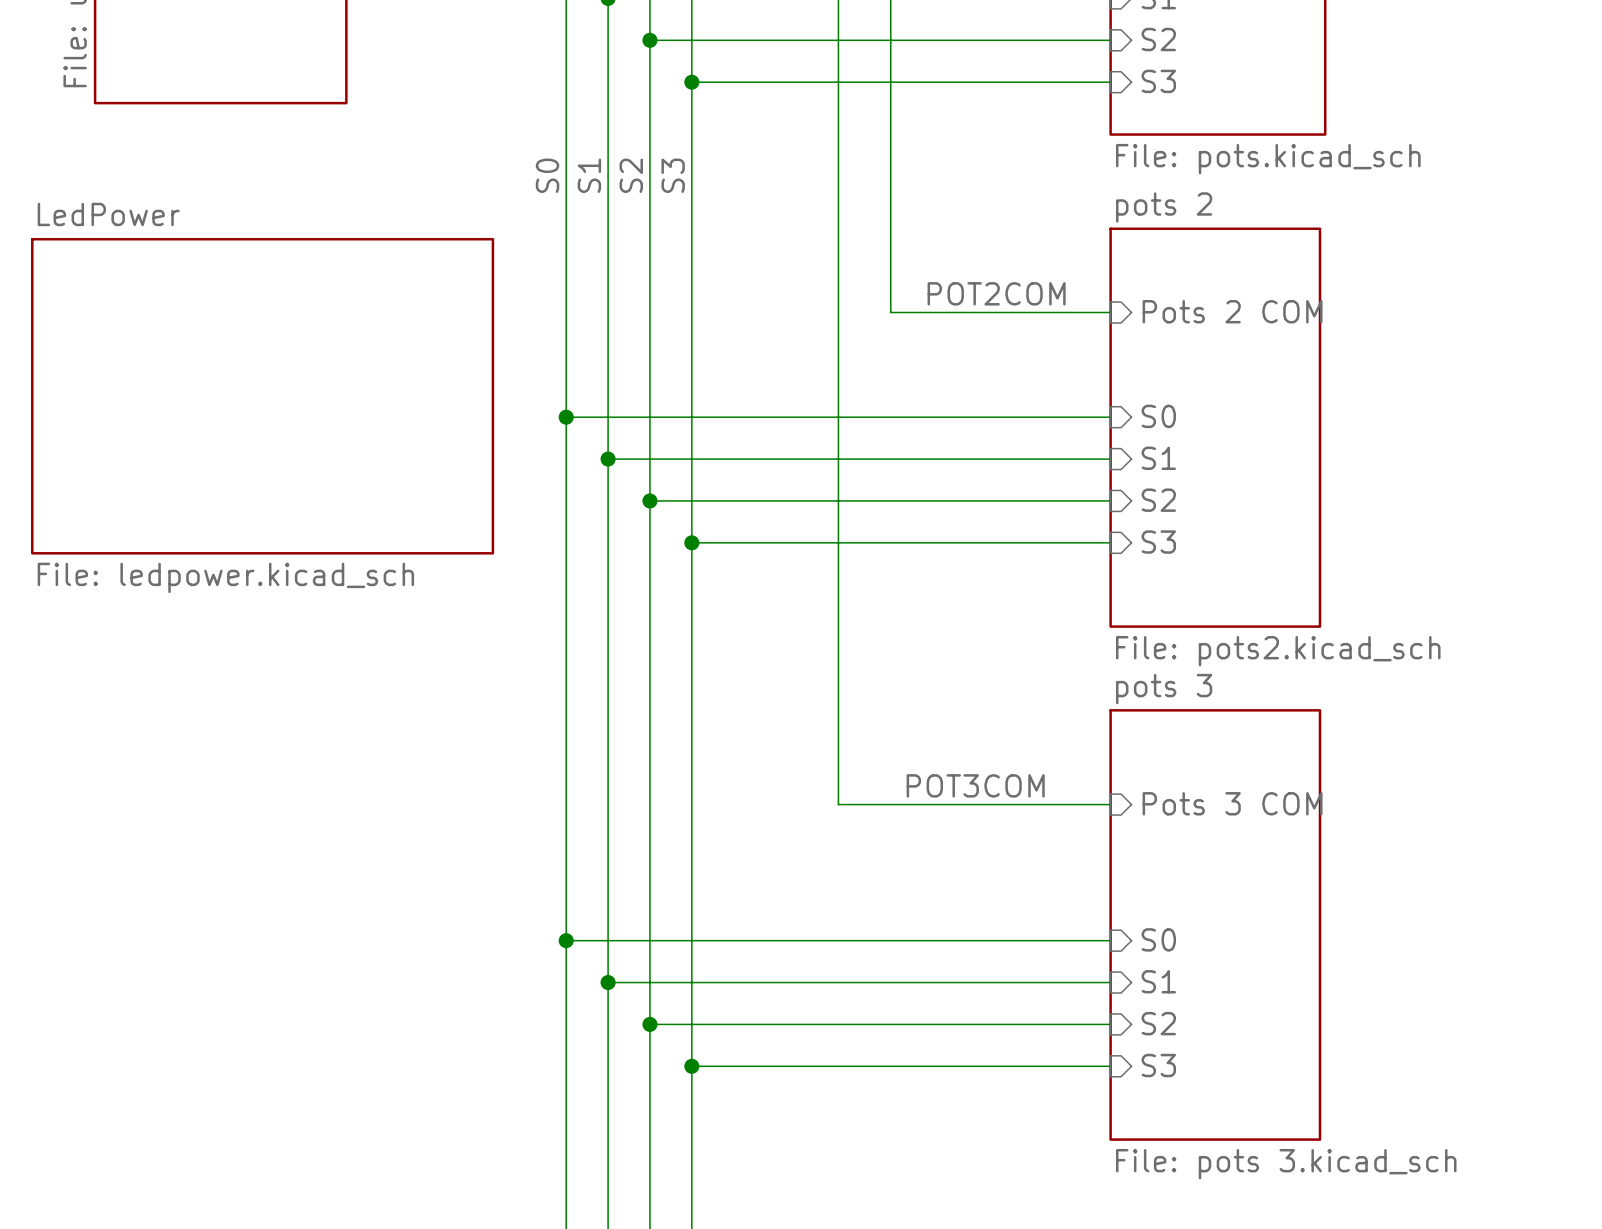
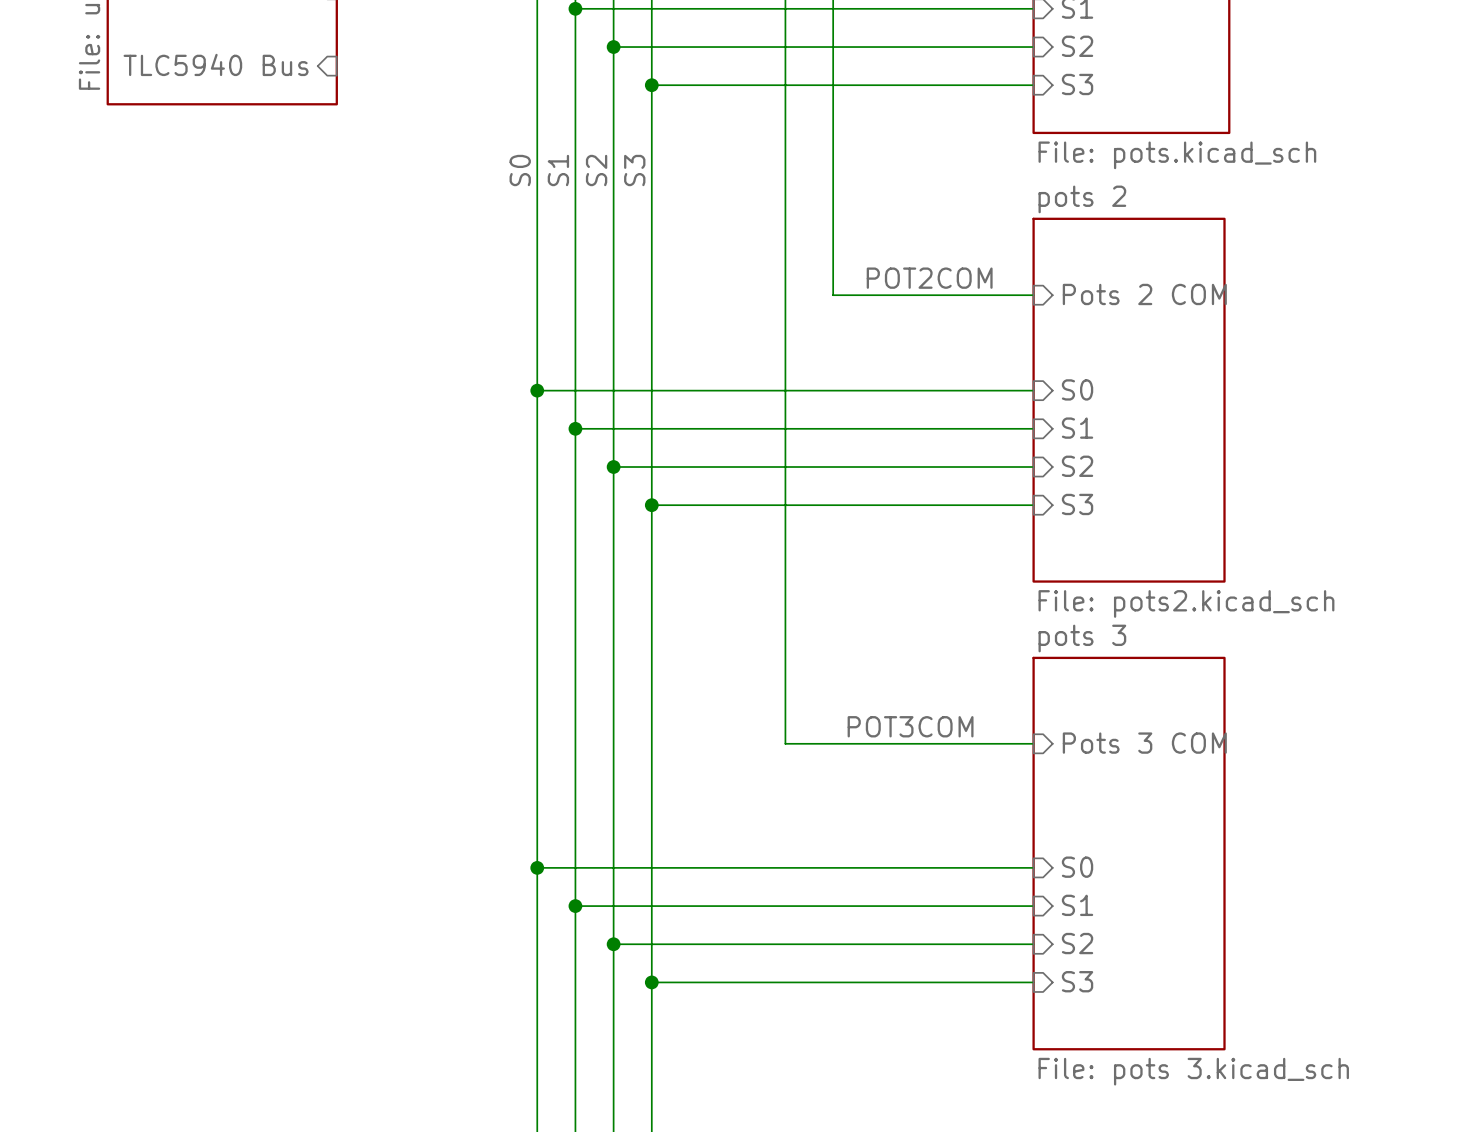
sheet pin: none -> TLC5940 Bus (216, 64)
sheet LedPower: File: ledpower.kicad_sch (262, 396) -> none

